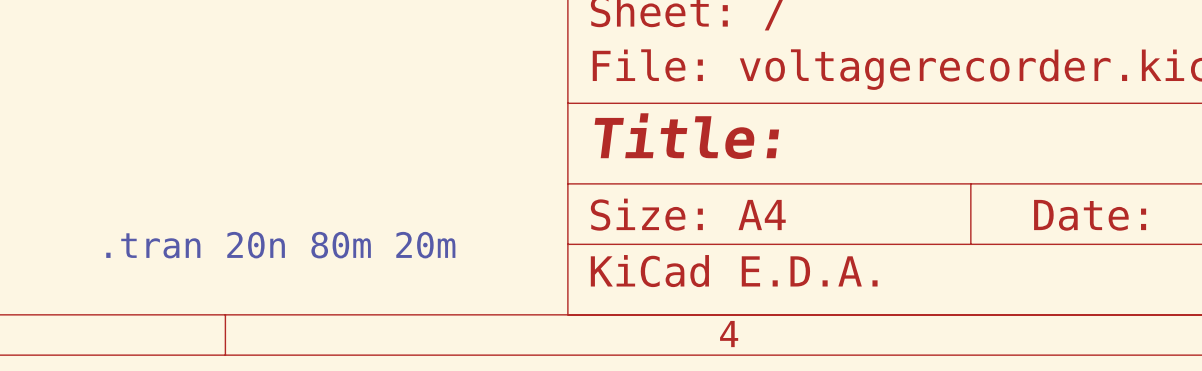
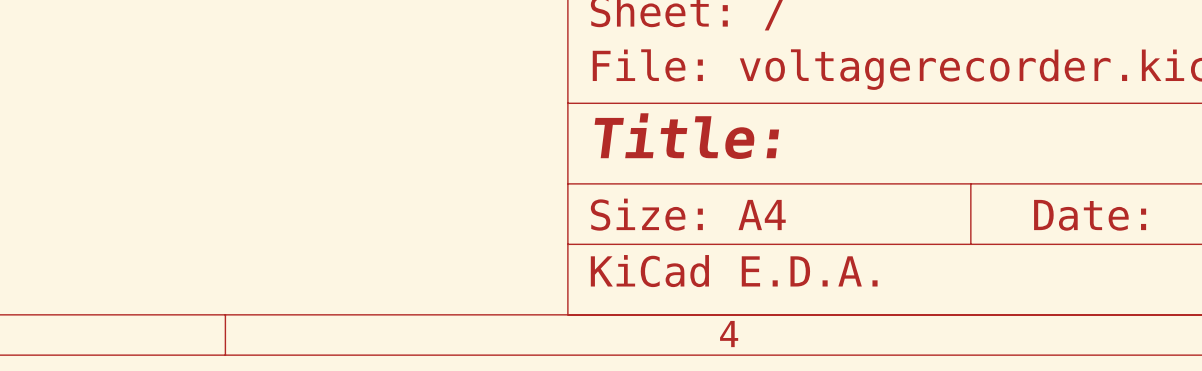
text: .tran 20n 80m 20m (280, 245) -> none

